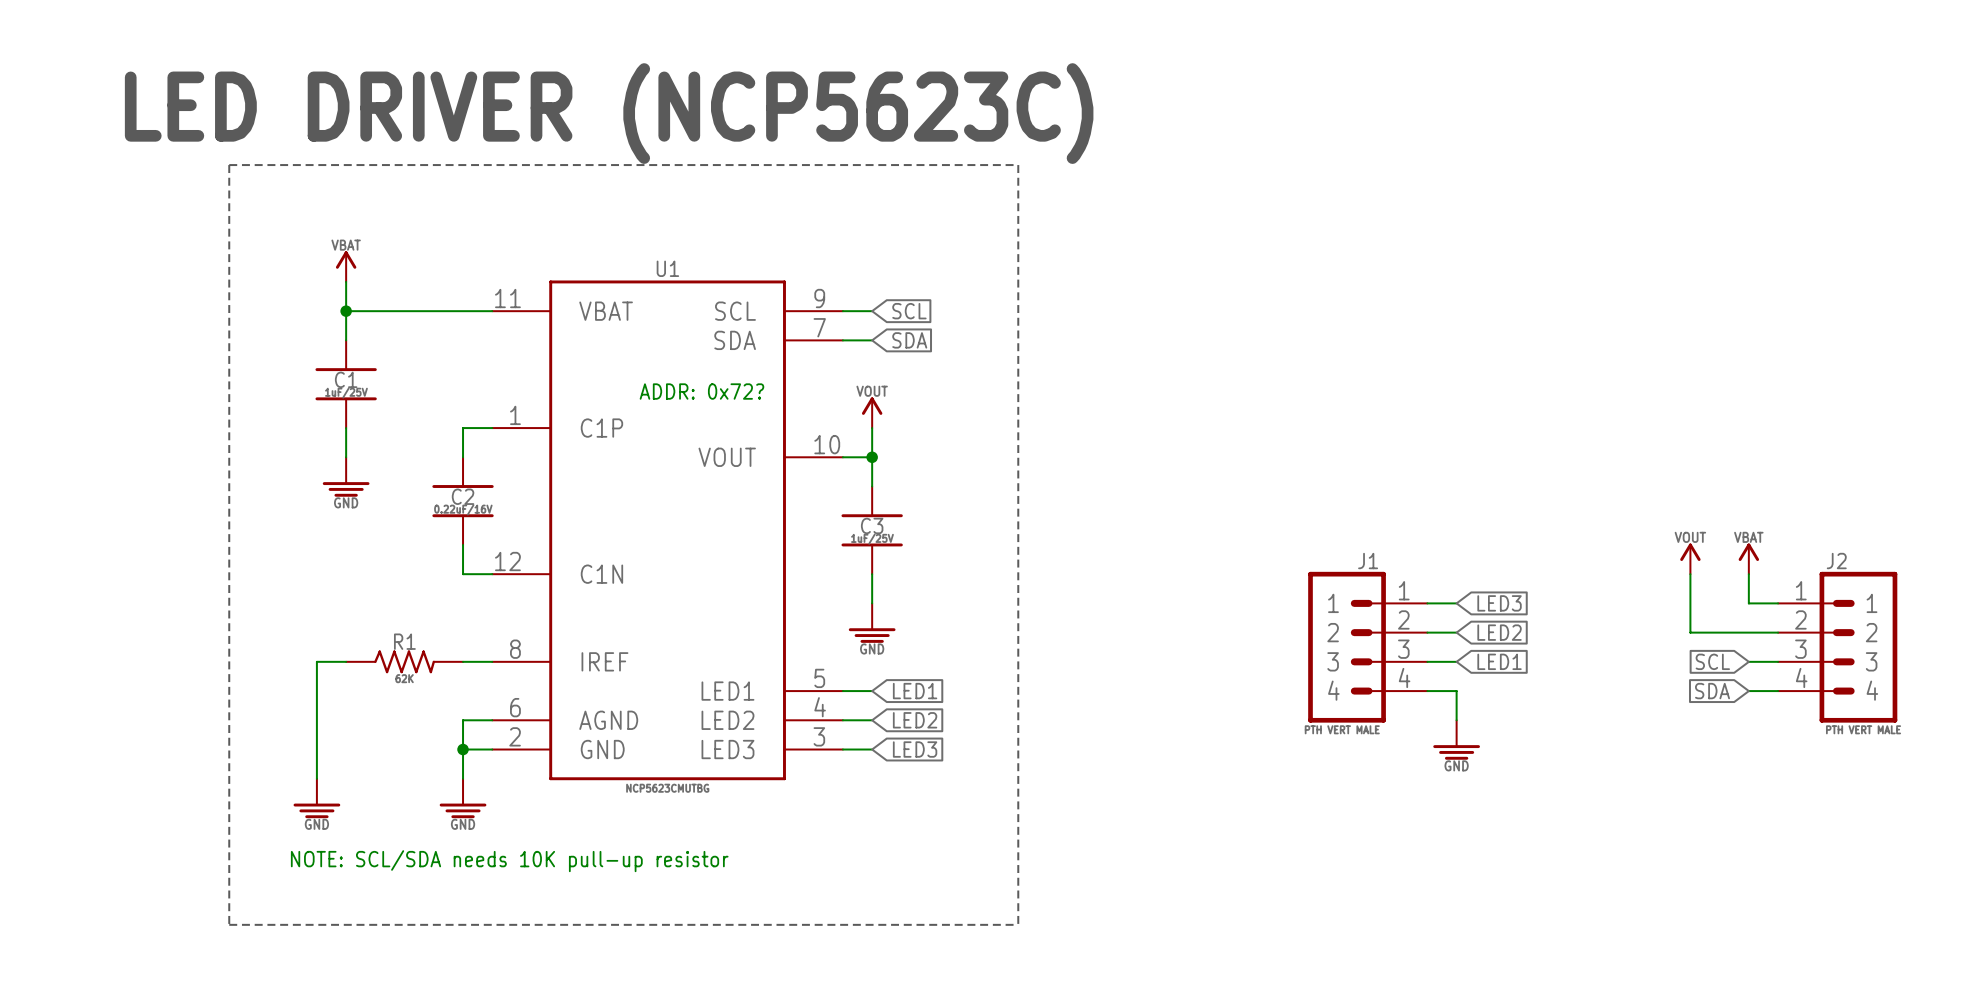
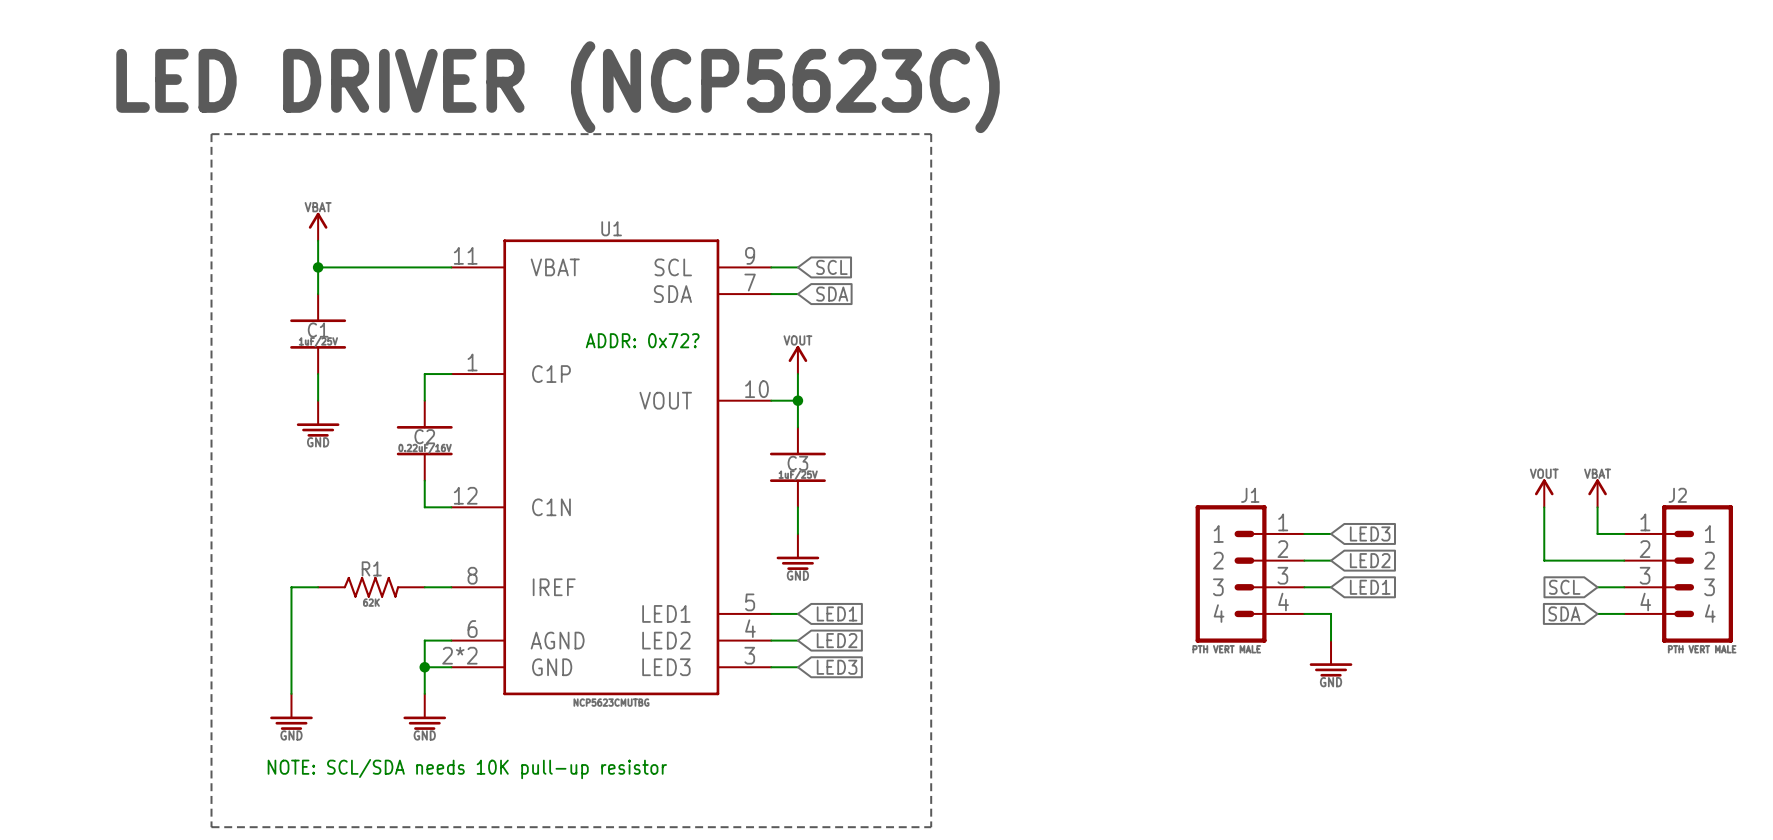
U1 pin number: 2 (515, 736) -> 2*2 (459, 655)

